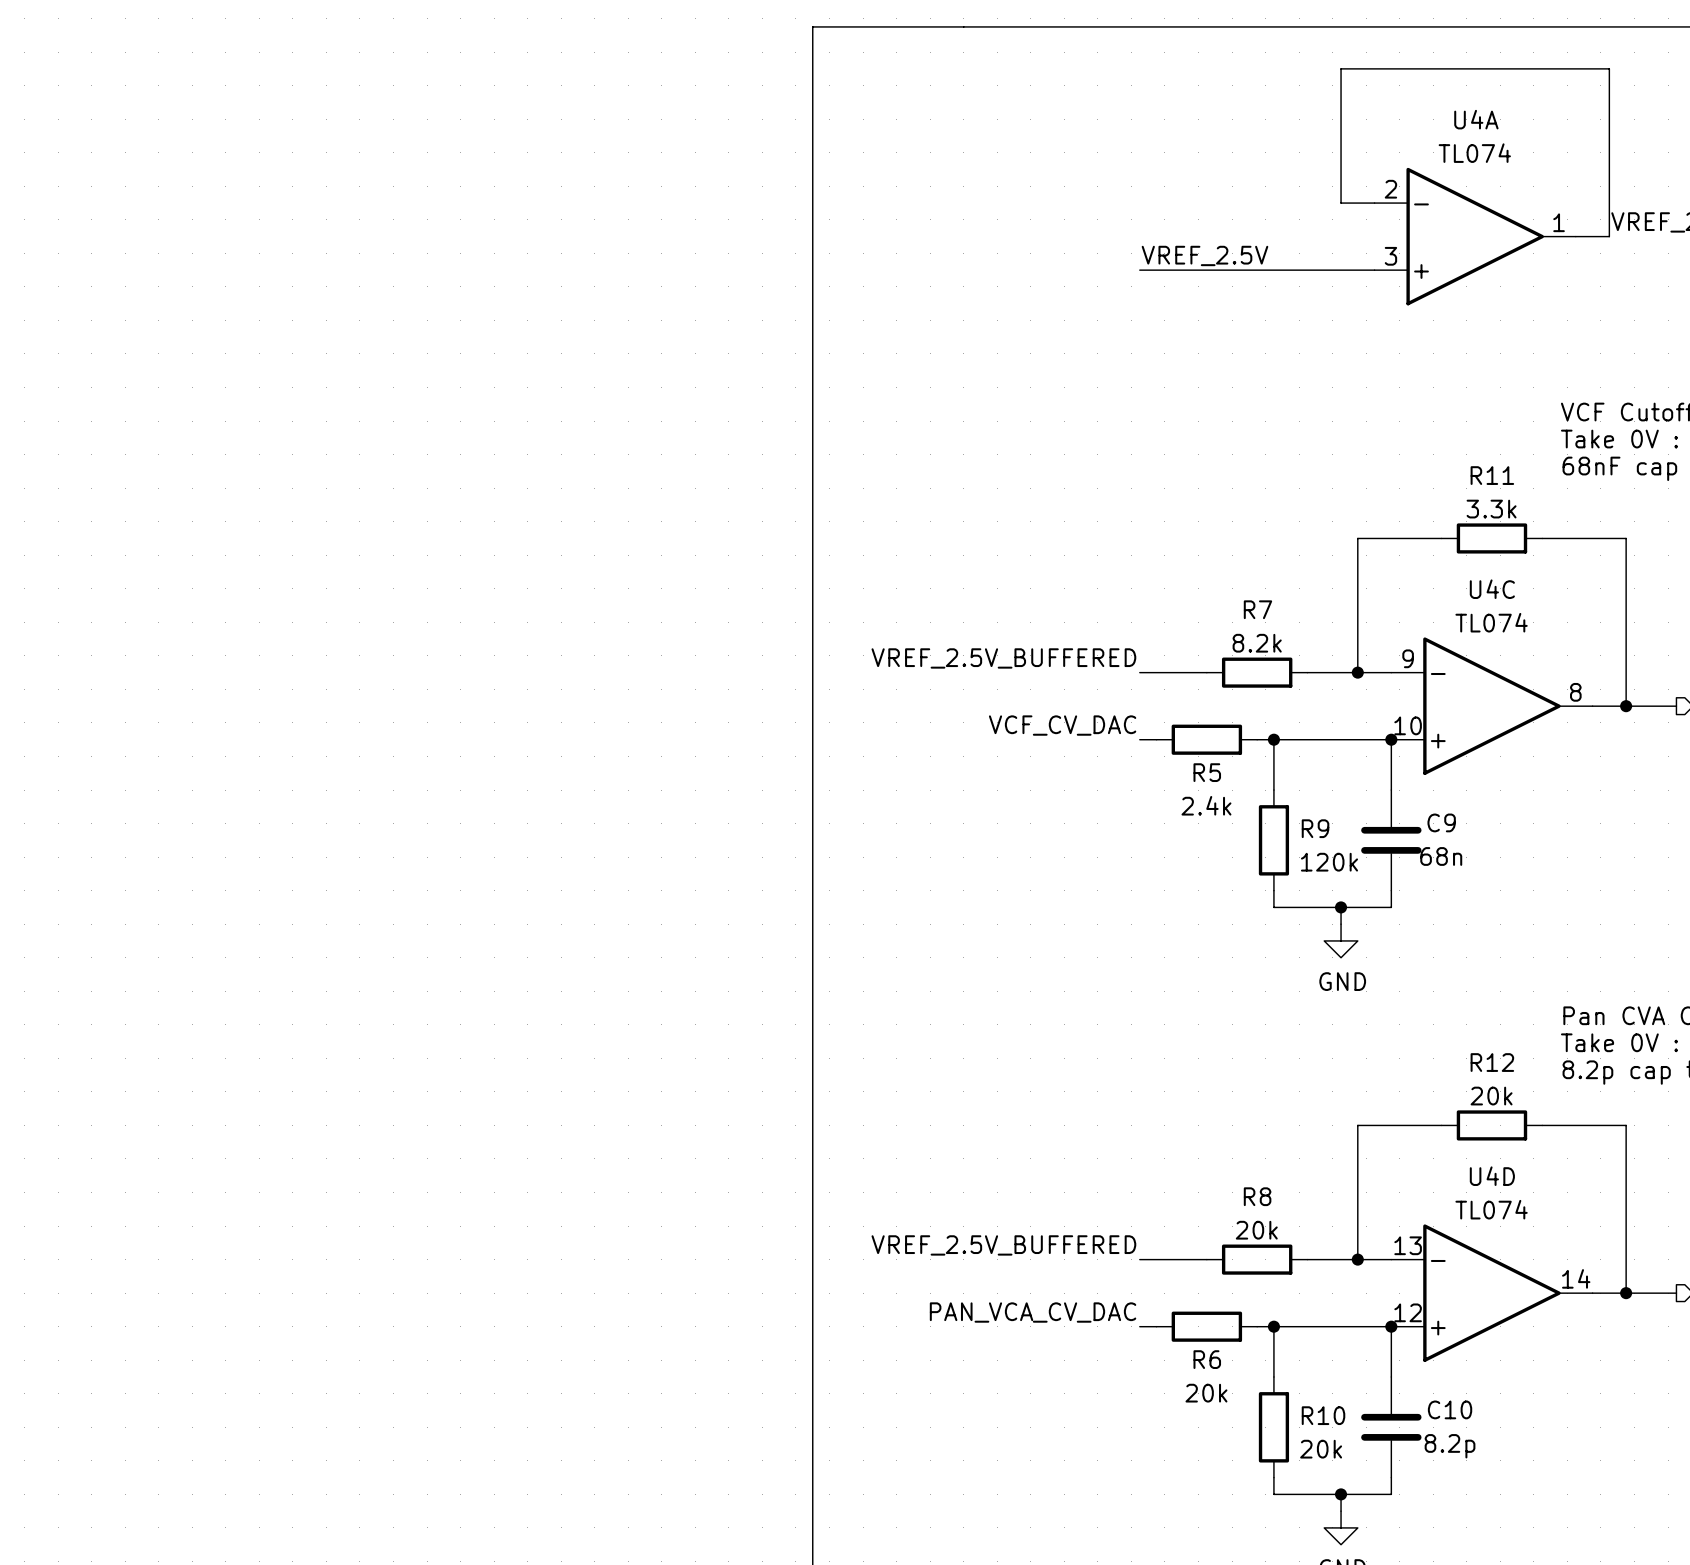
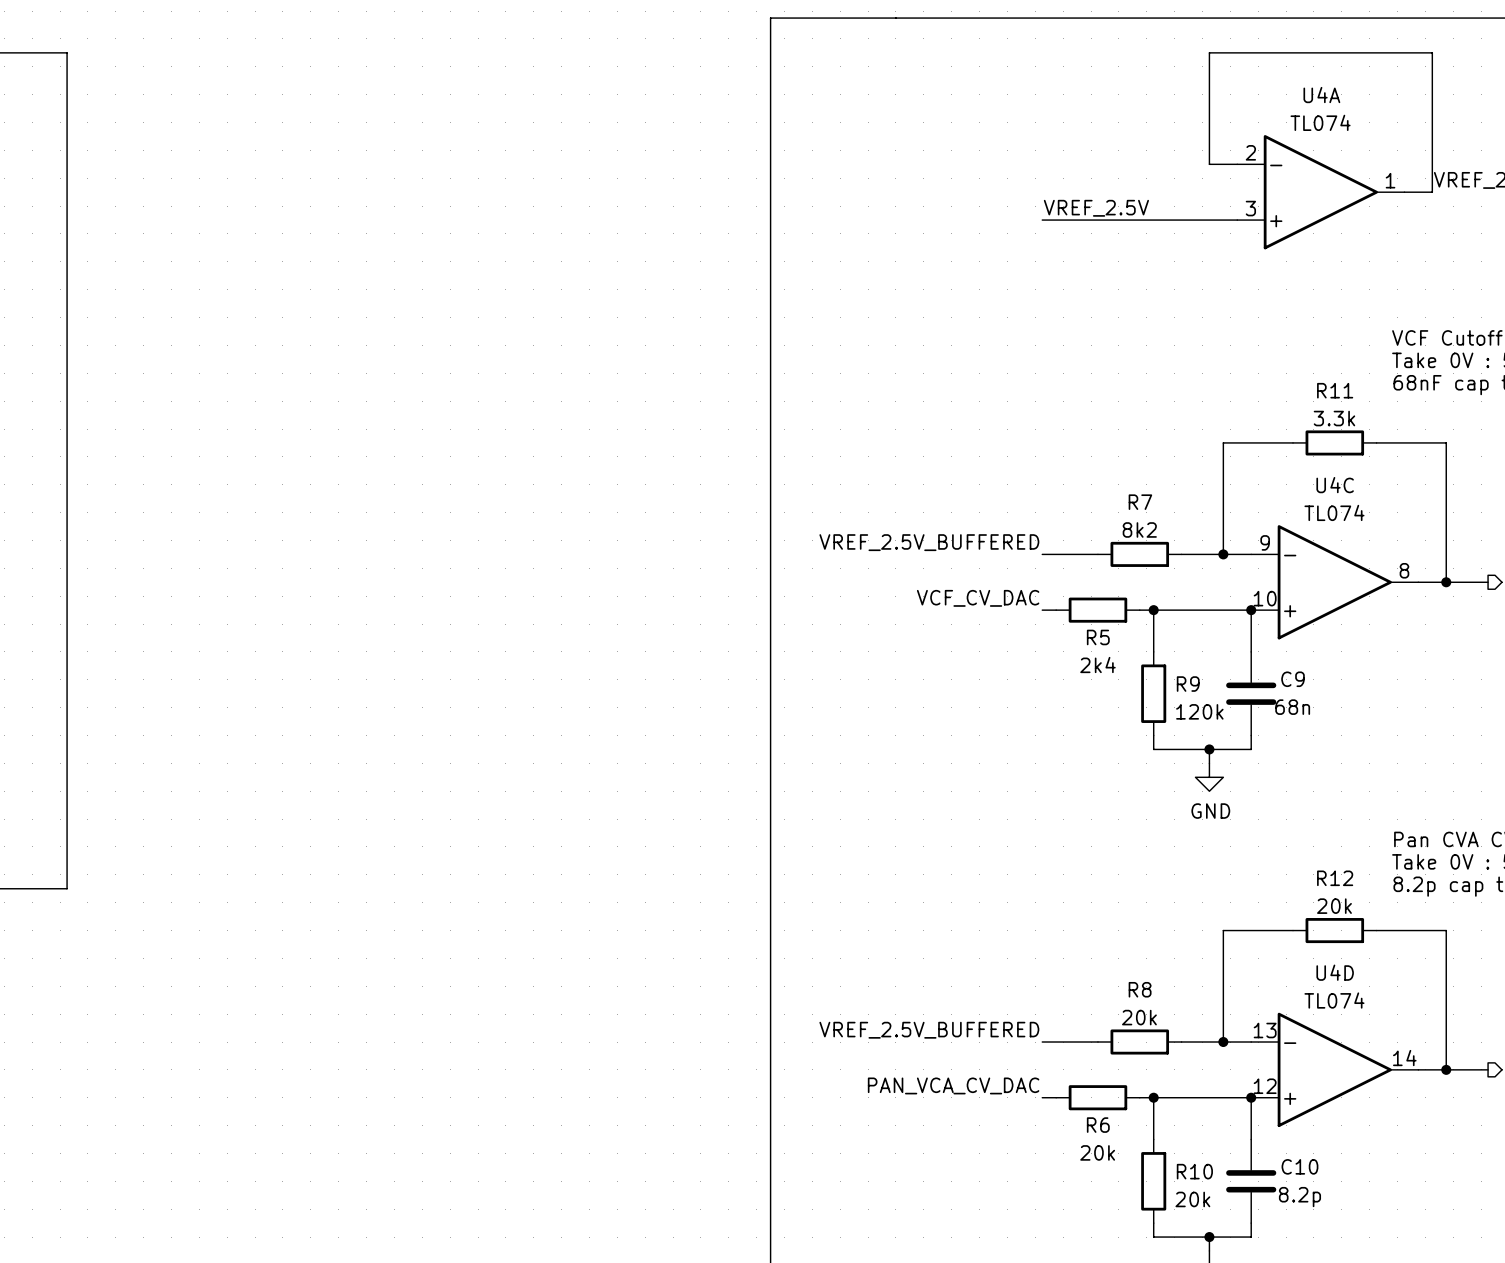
R7 value: 8.2k (1257, 643) -> 8k2 (1139, 529)
R5 value: 2.4k (1206, 805) -> 2k4 (1097, 665)

